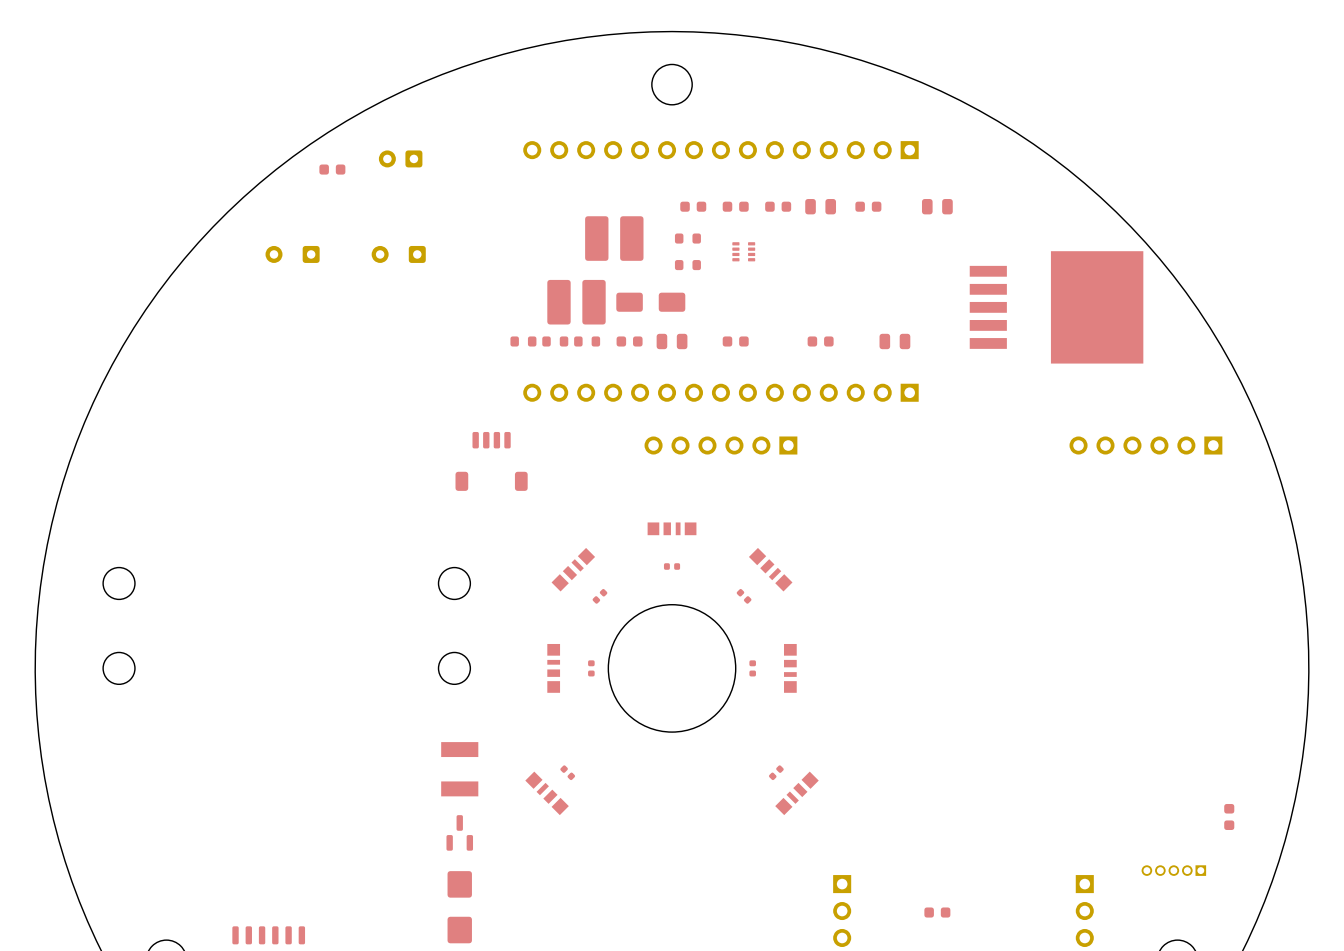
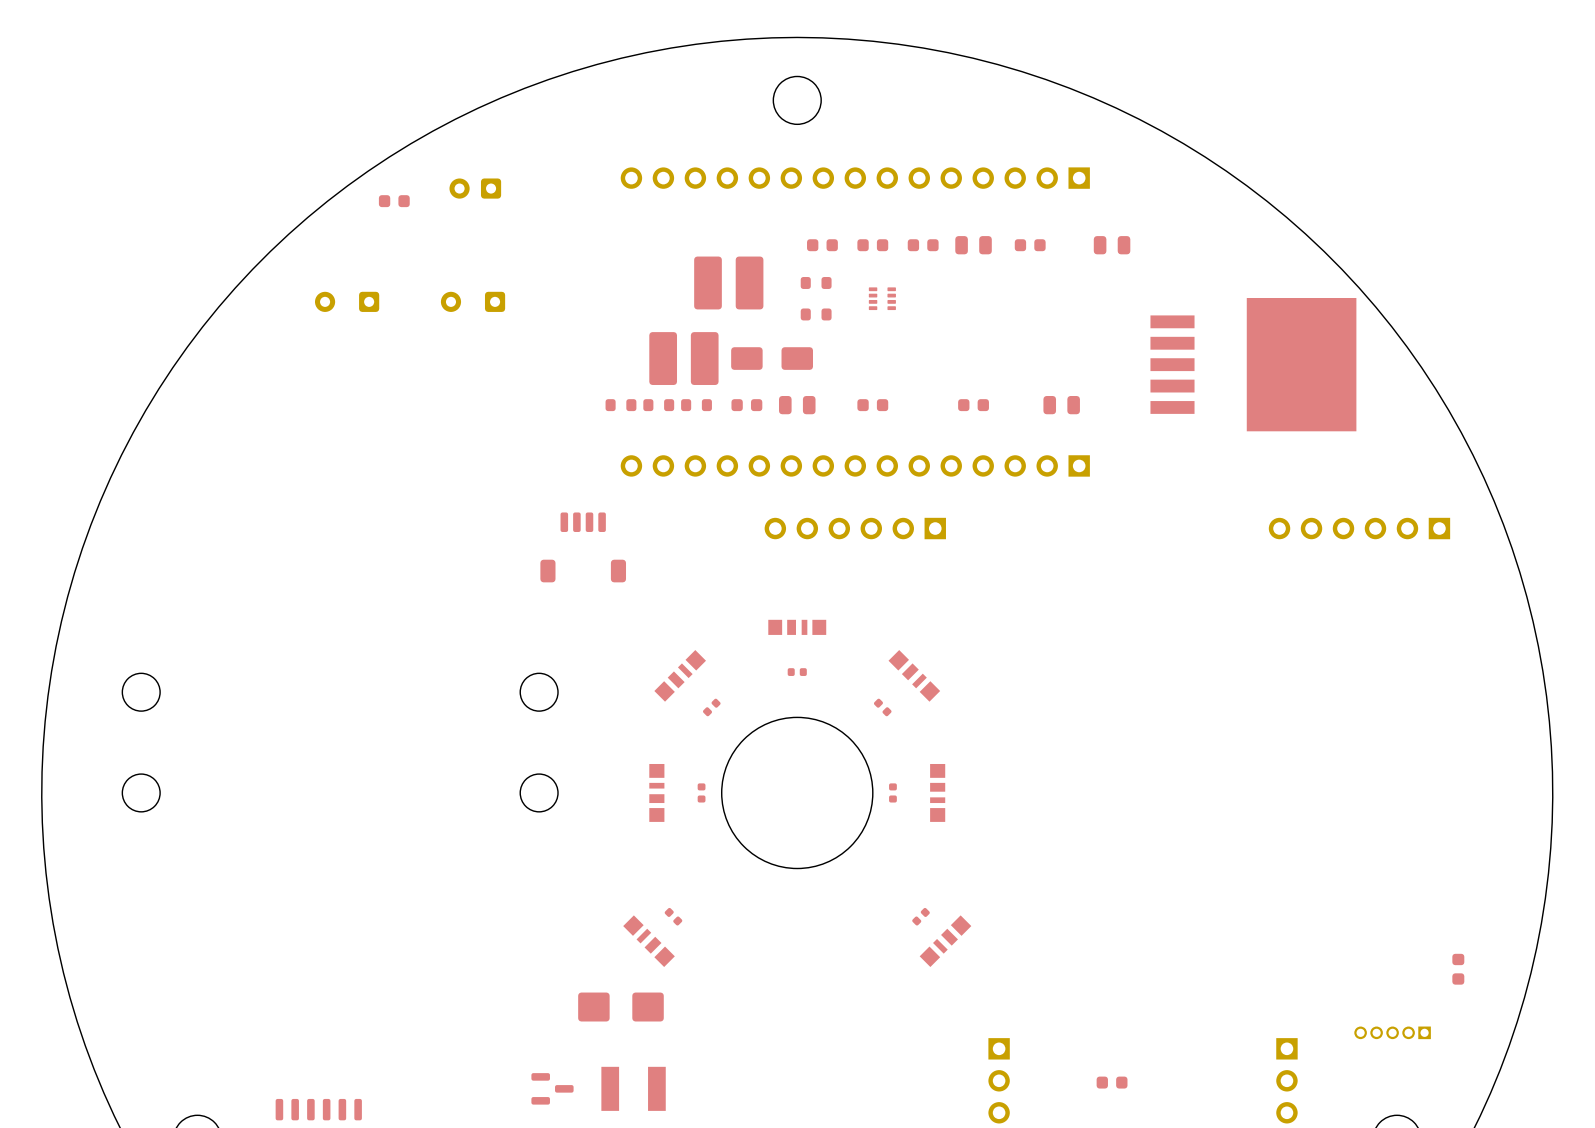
part rotation: 0° (459, 769) -> 90° clockwise (633, 1088)
part position: (459, 769) -> (633, 1088)
part rotation: 0° (459, 832) -> 90° clockwise (552, 1088)
part position: (459, 832) -> (552, 1088)
part rotation: 0° (459, 907) -> 90° clockwise (620, 1007)
part position: (459, 907) -> (620, 1007)

